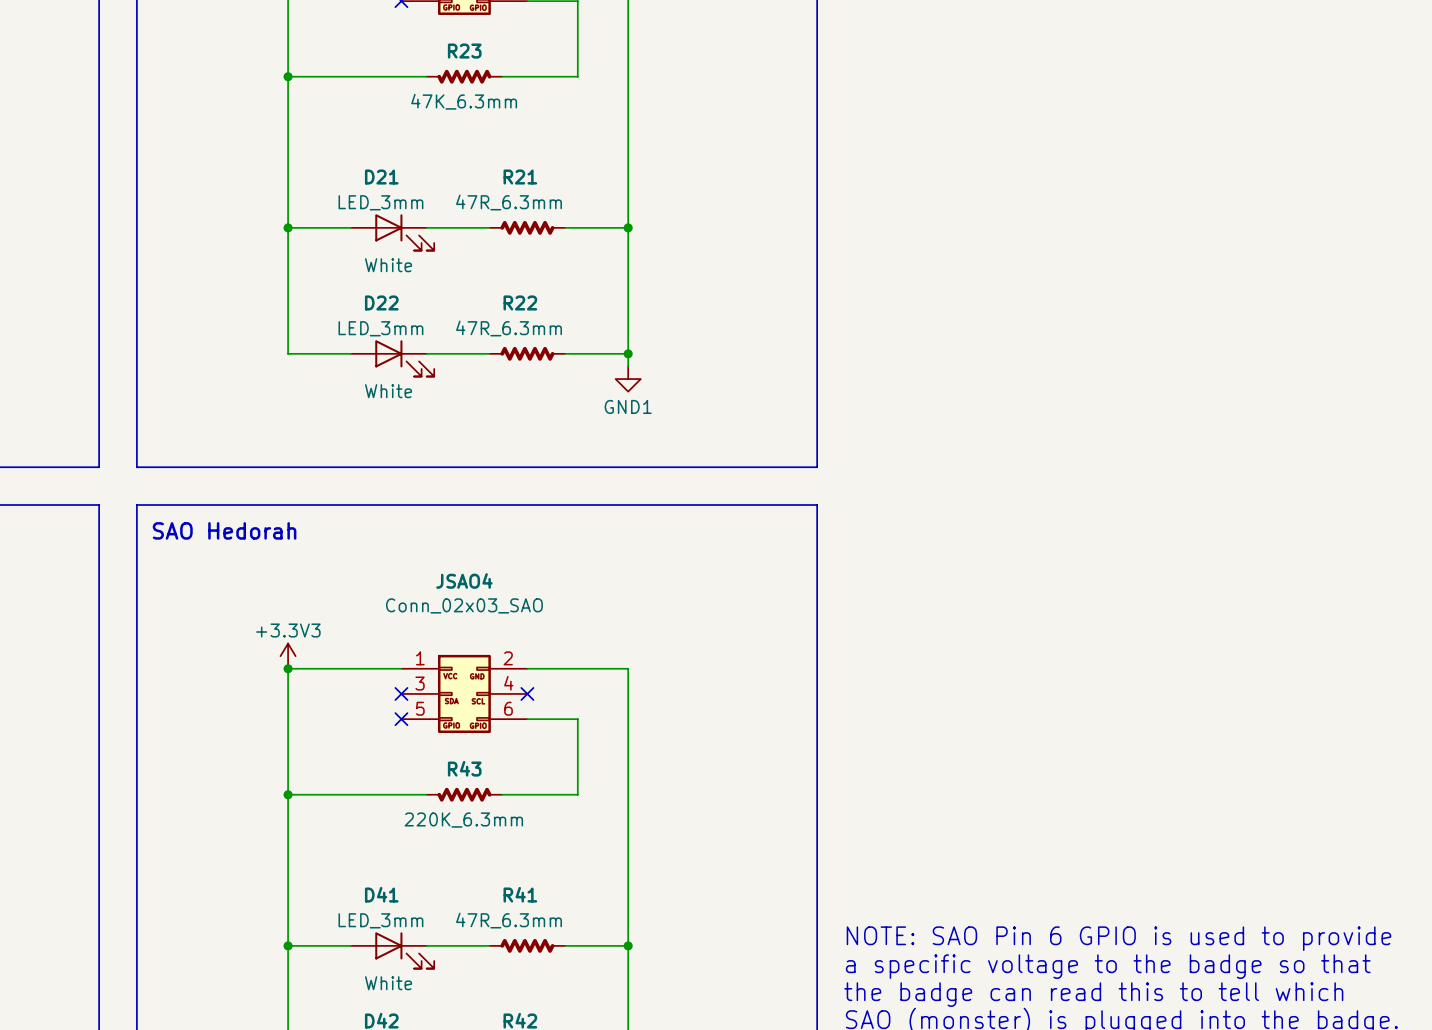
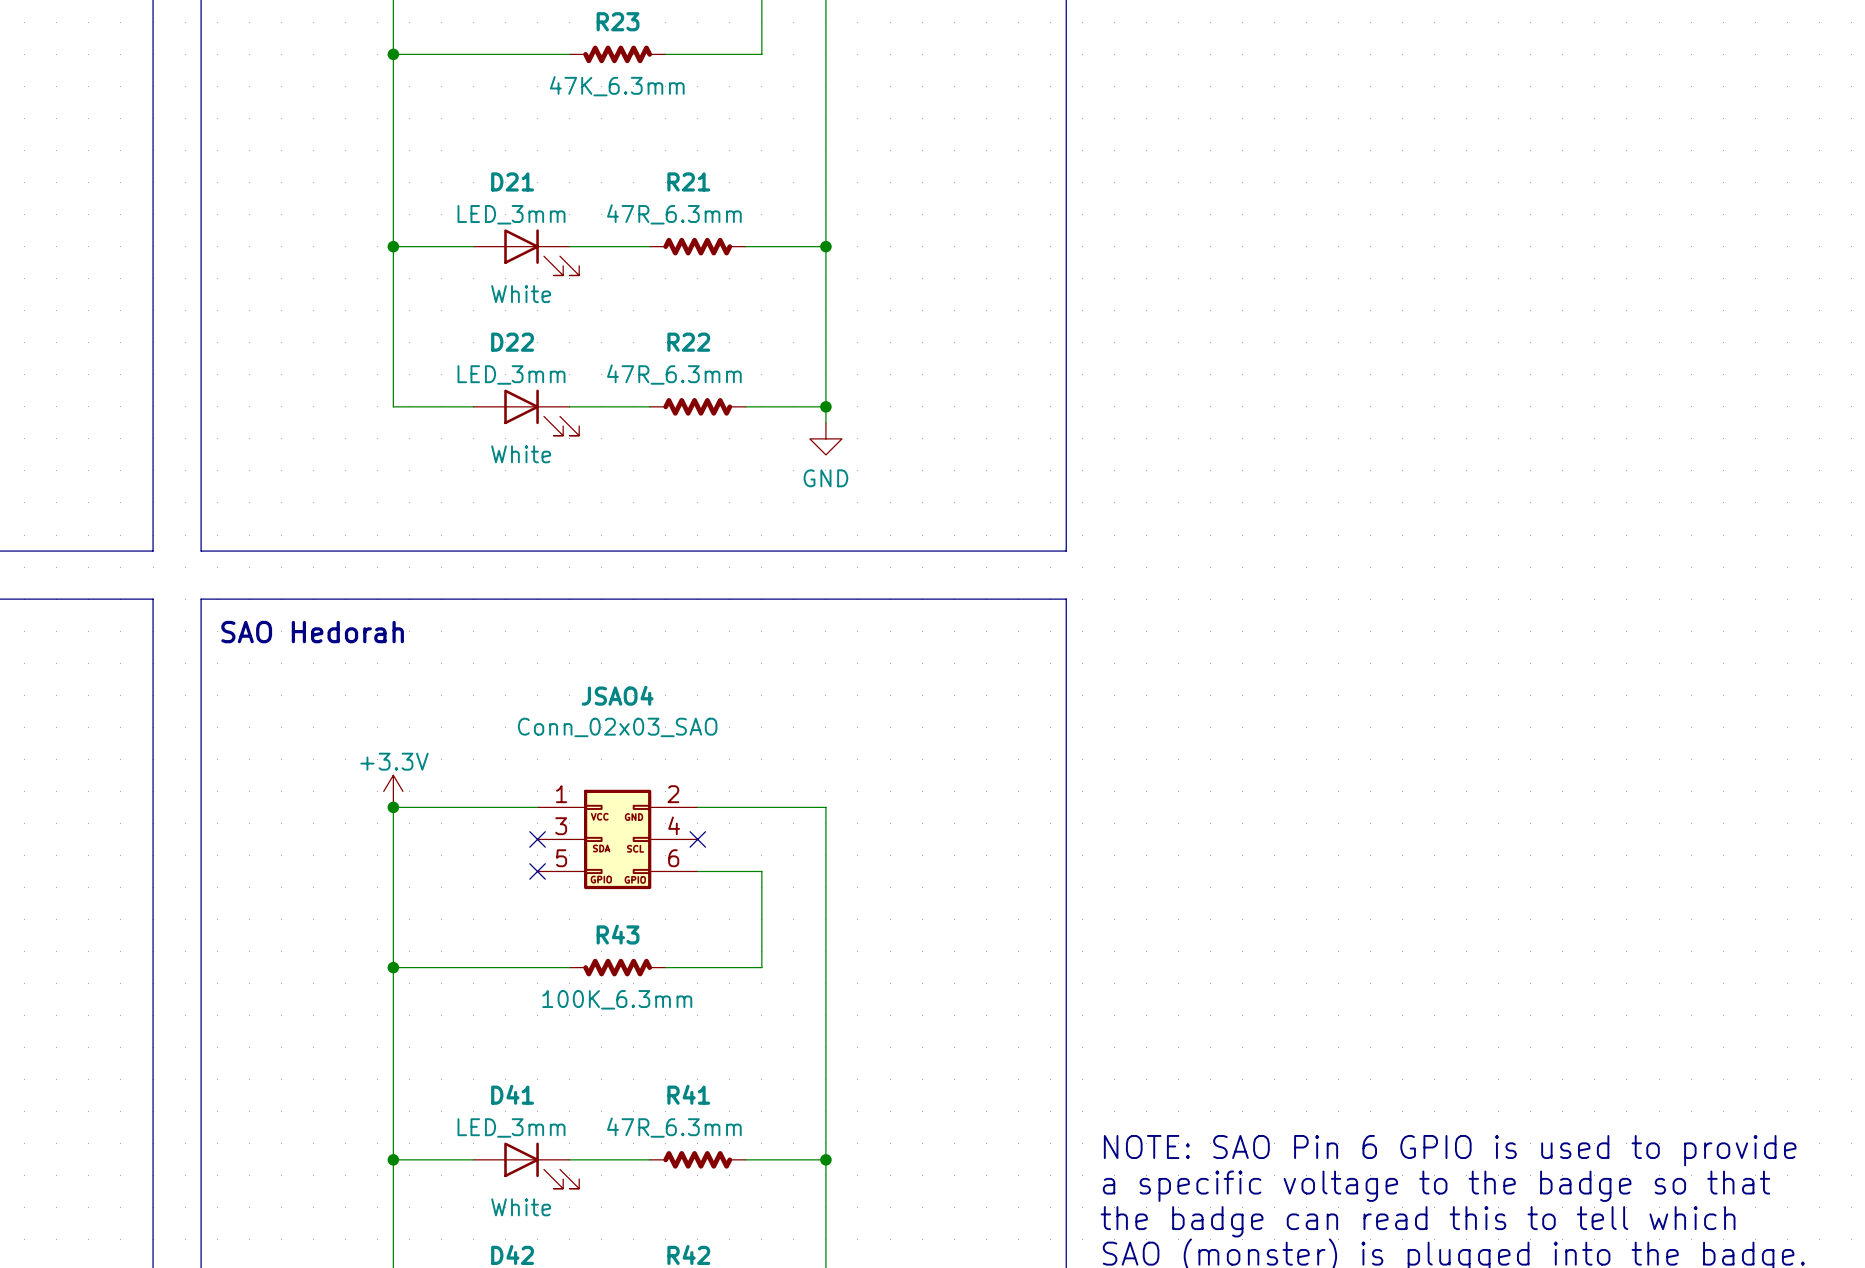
power symbol: GND1 (628, 379) -> GND (825, 438)
power symbol: +3.3V3 (288, 656) -> +3.3V (393, 791)
R43 value: 220K_6.3mm (463, 820) -> 100K_6.3mm (617, 999)

